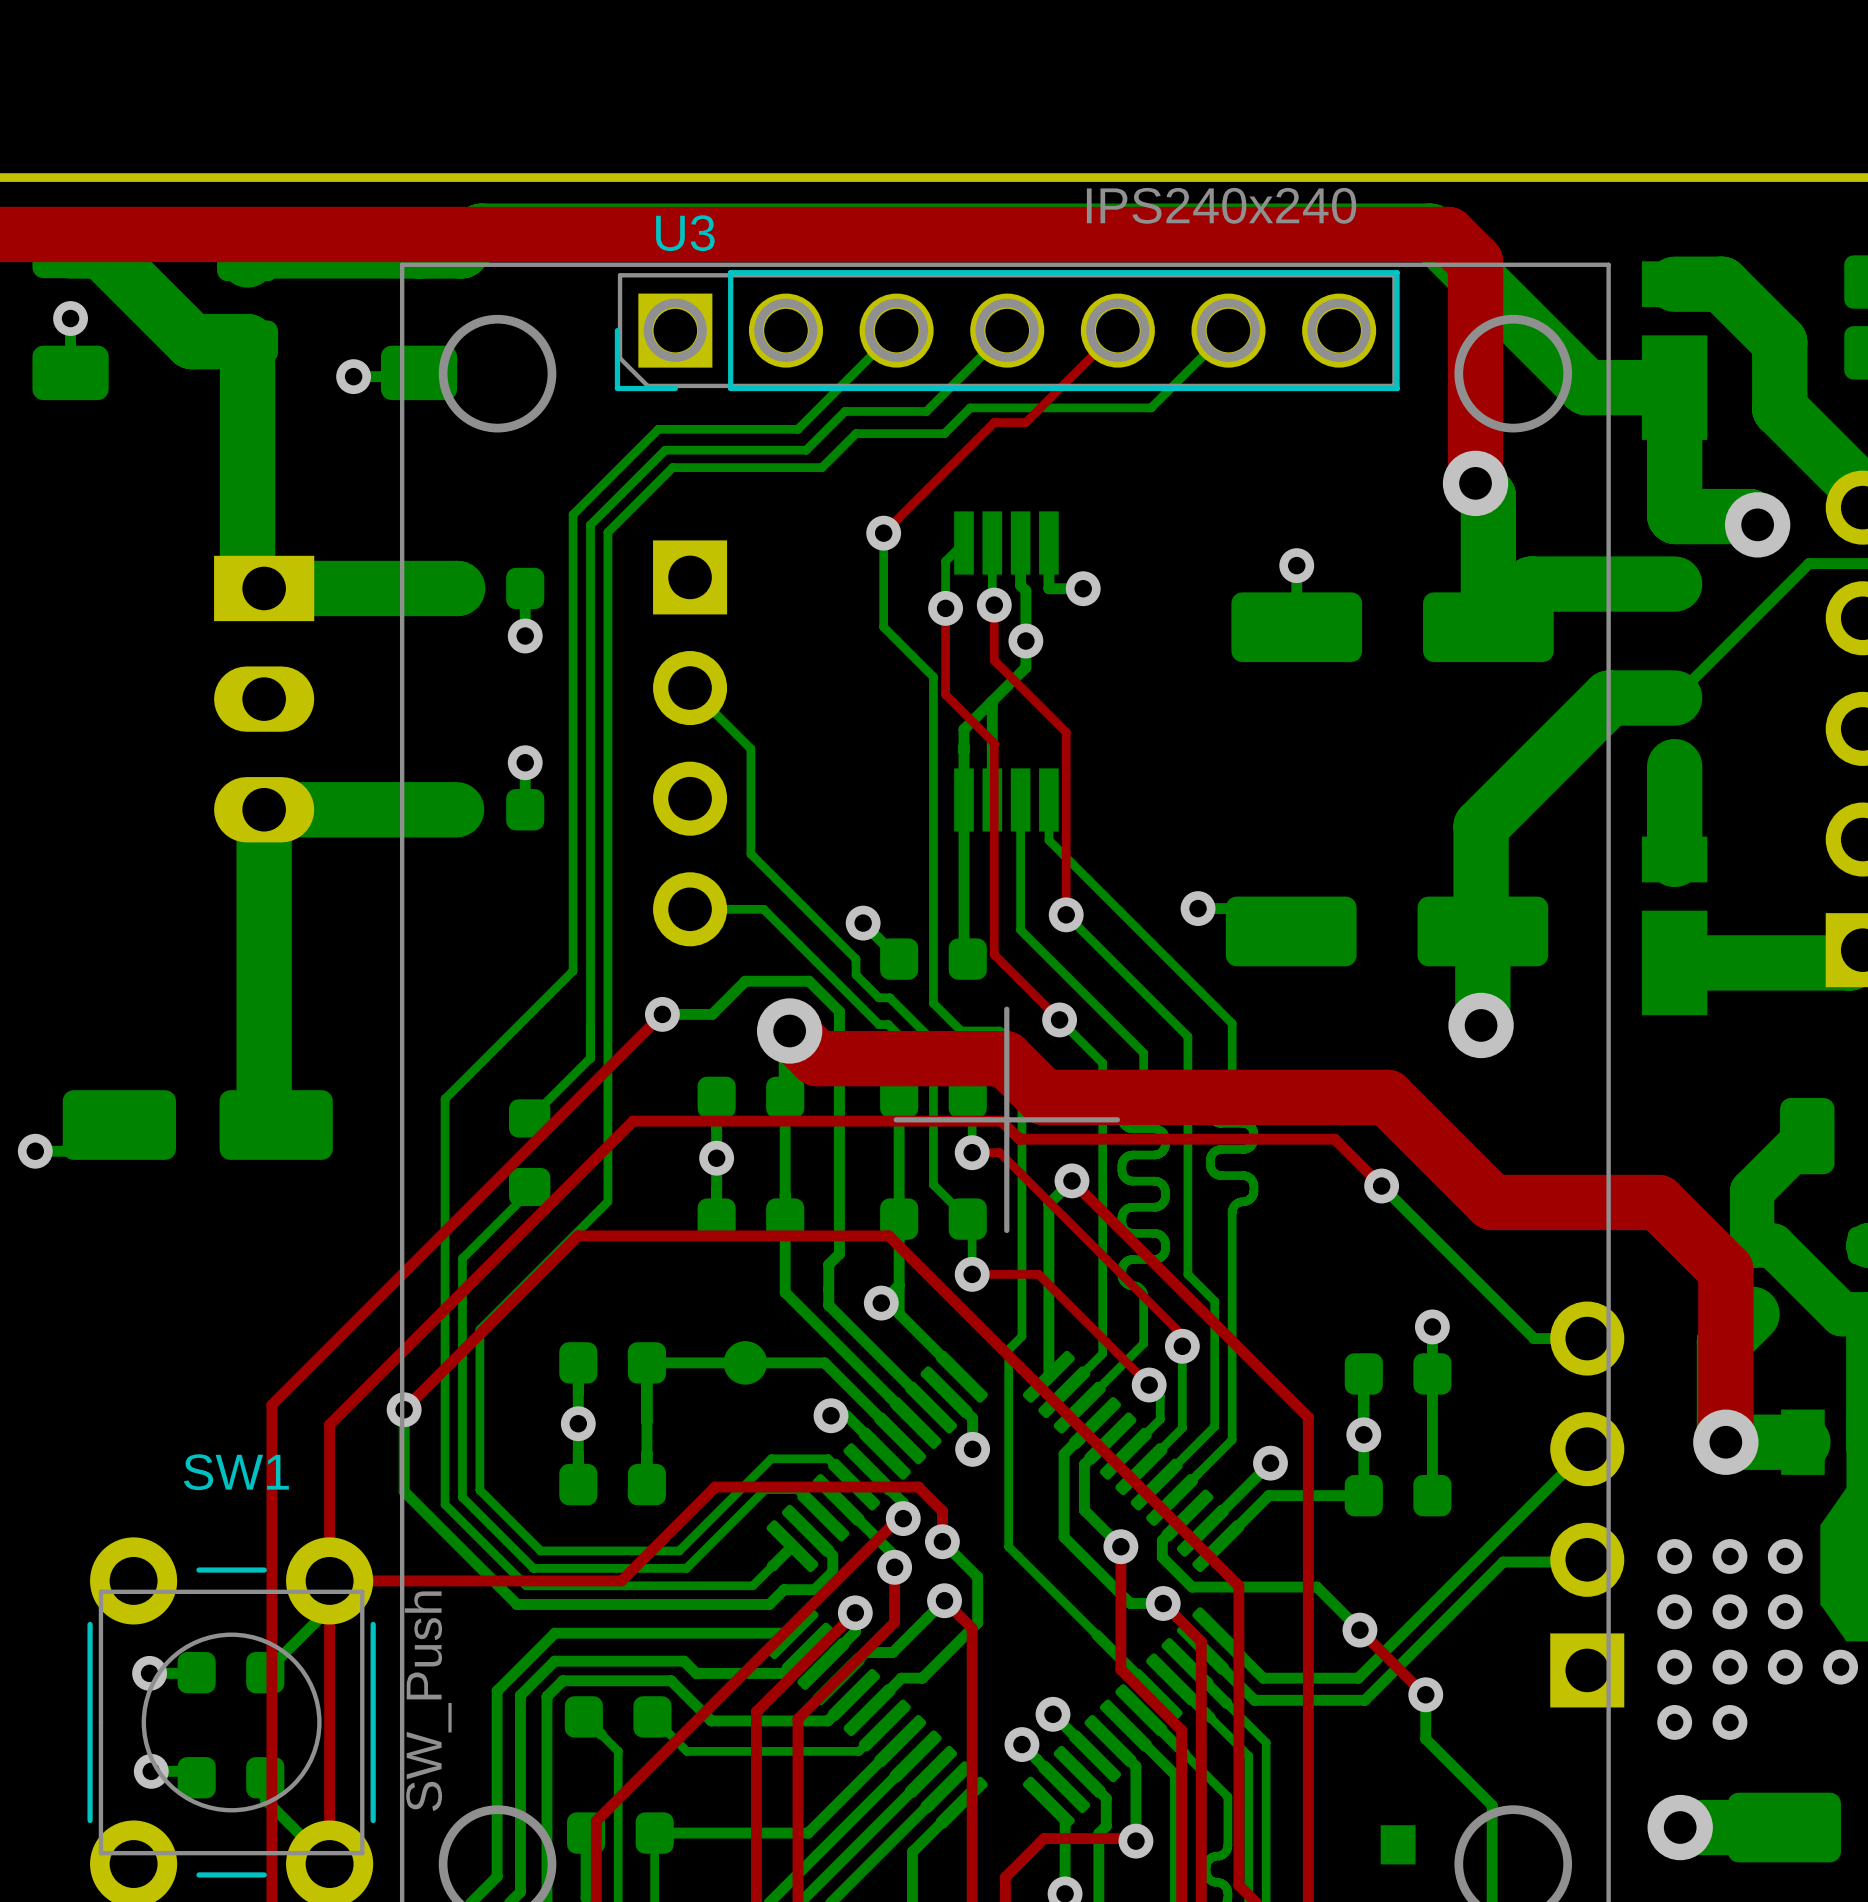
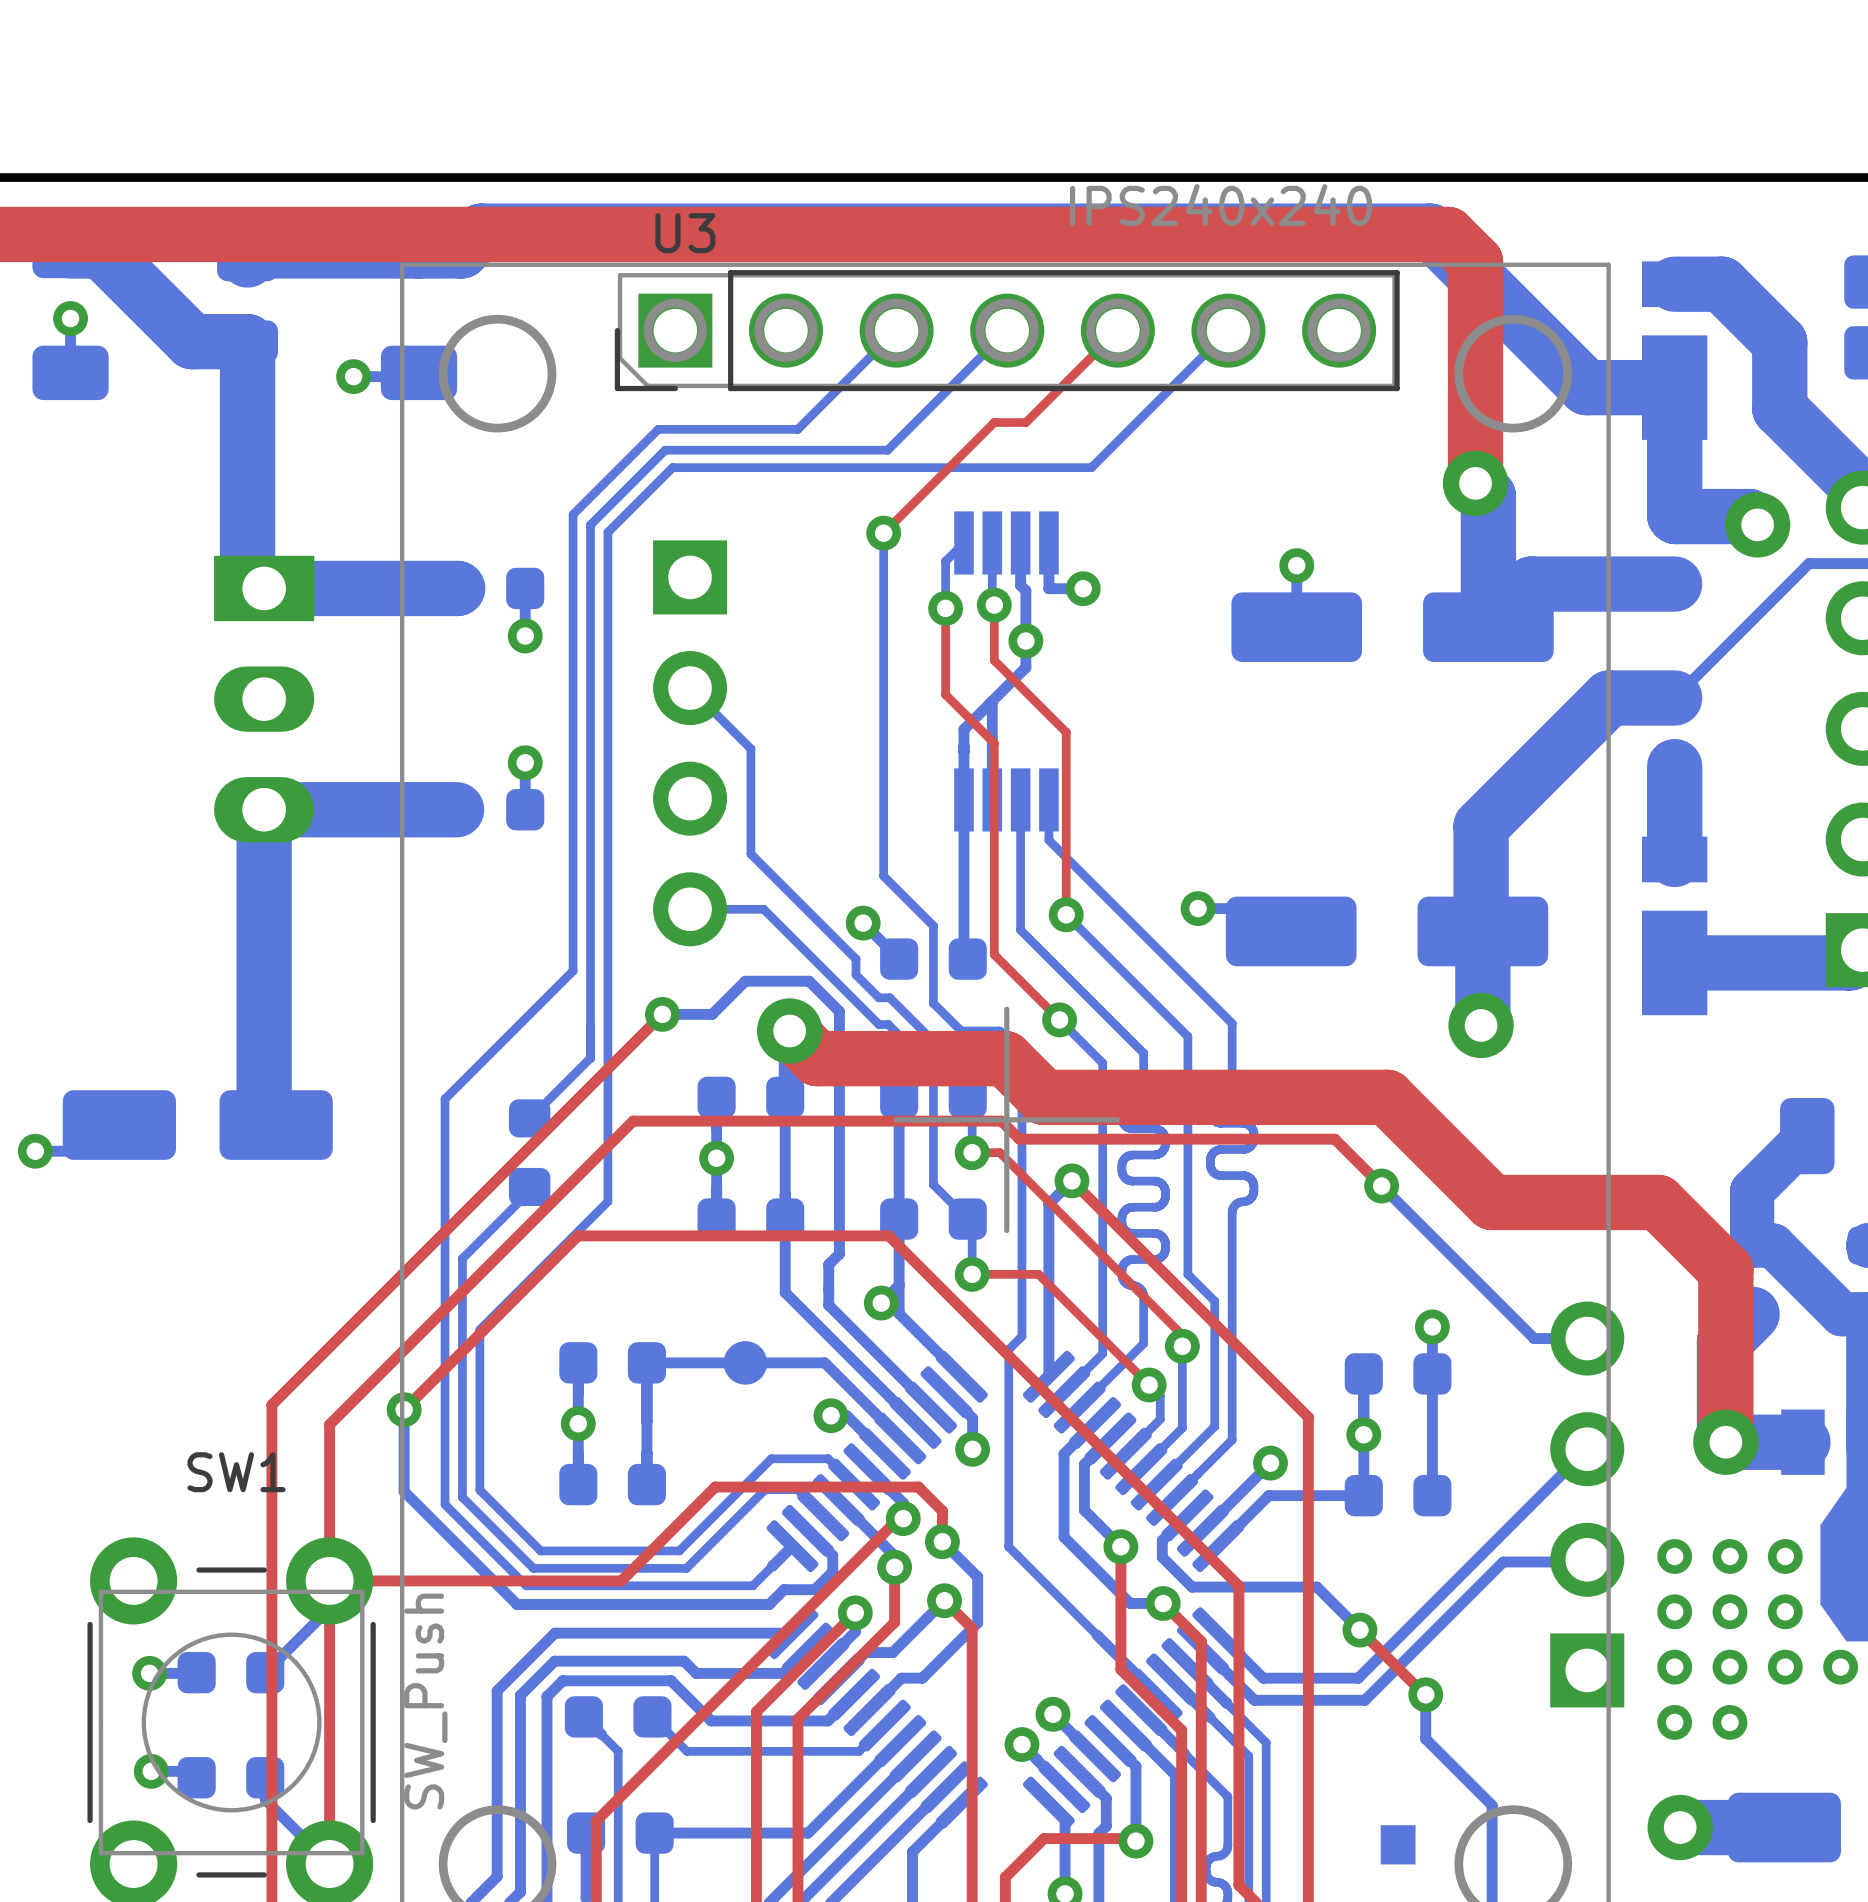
bottom track: (1007, 330) (926, 411) (844, 411) (806, 450) -> (1007, 330) (887, 450) (806, 450)
bottom track: (1151, 407) (970, 407) (944, 433) (856, 433) (822, 467) -> (1151, 407) (1091, 467) (822, 467)
bottom track: (883, 627) (933, 676) (933, 925) -> (883, 627) (883, 876) (933, 925)

